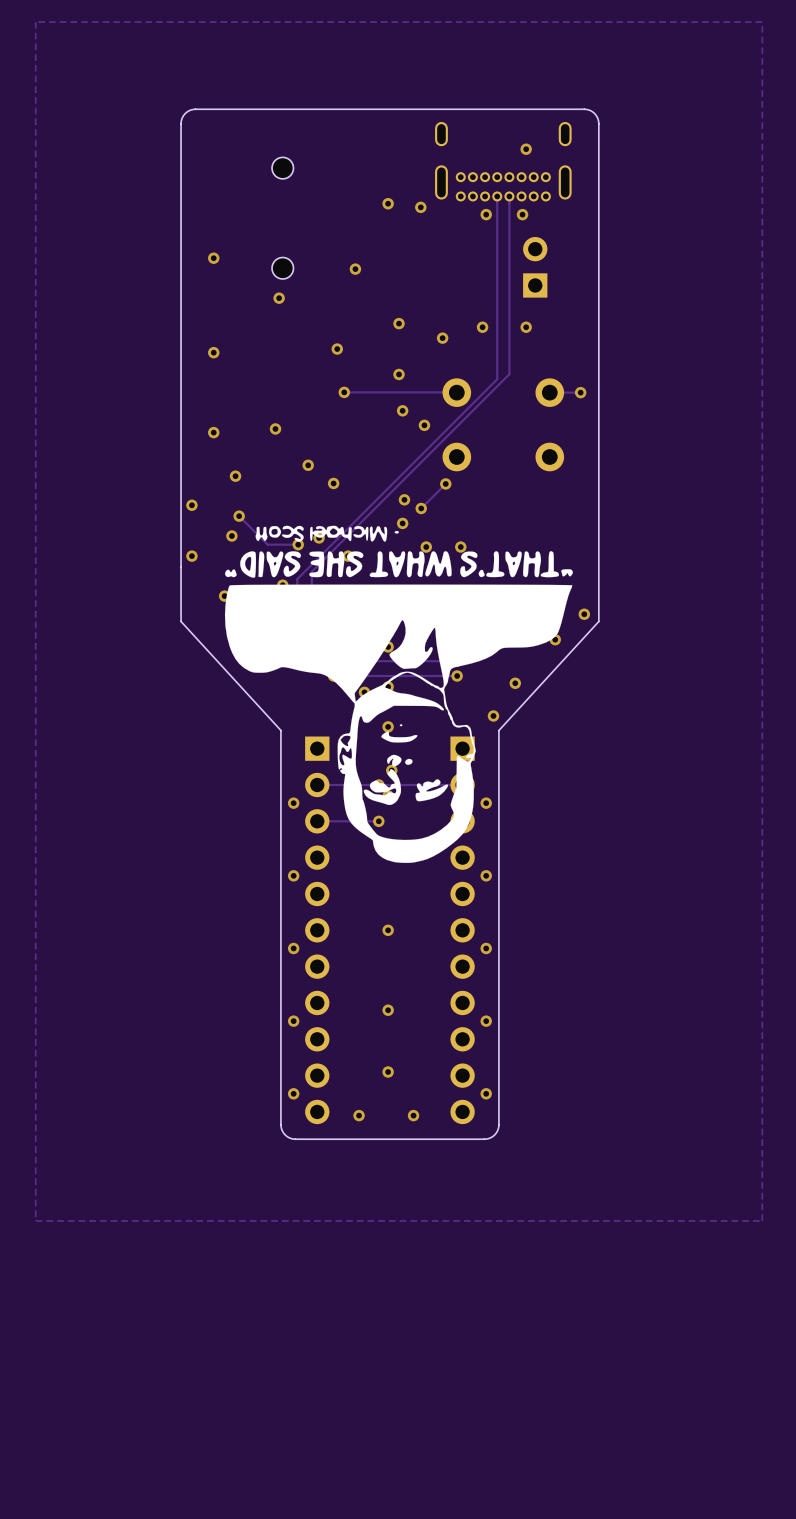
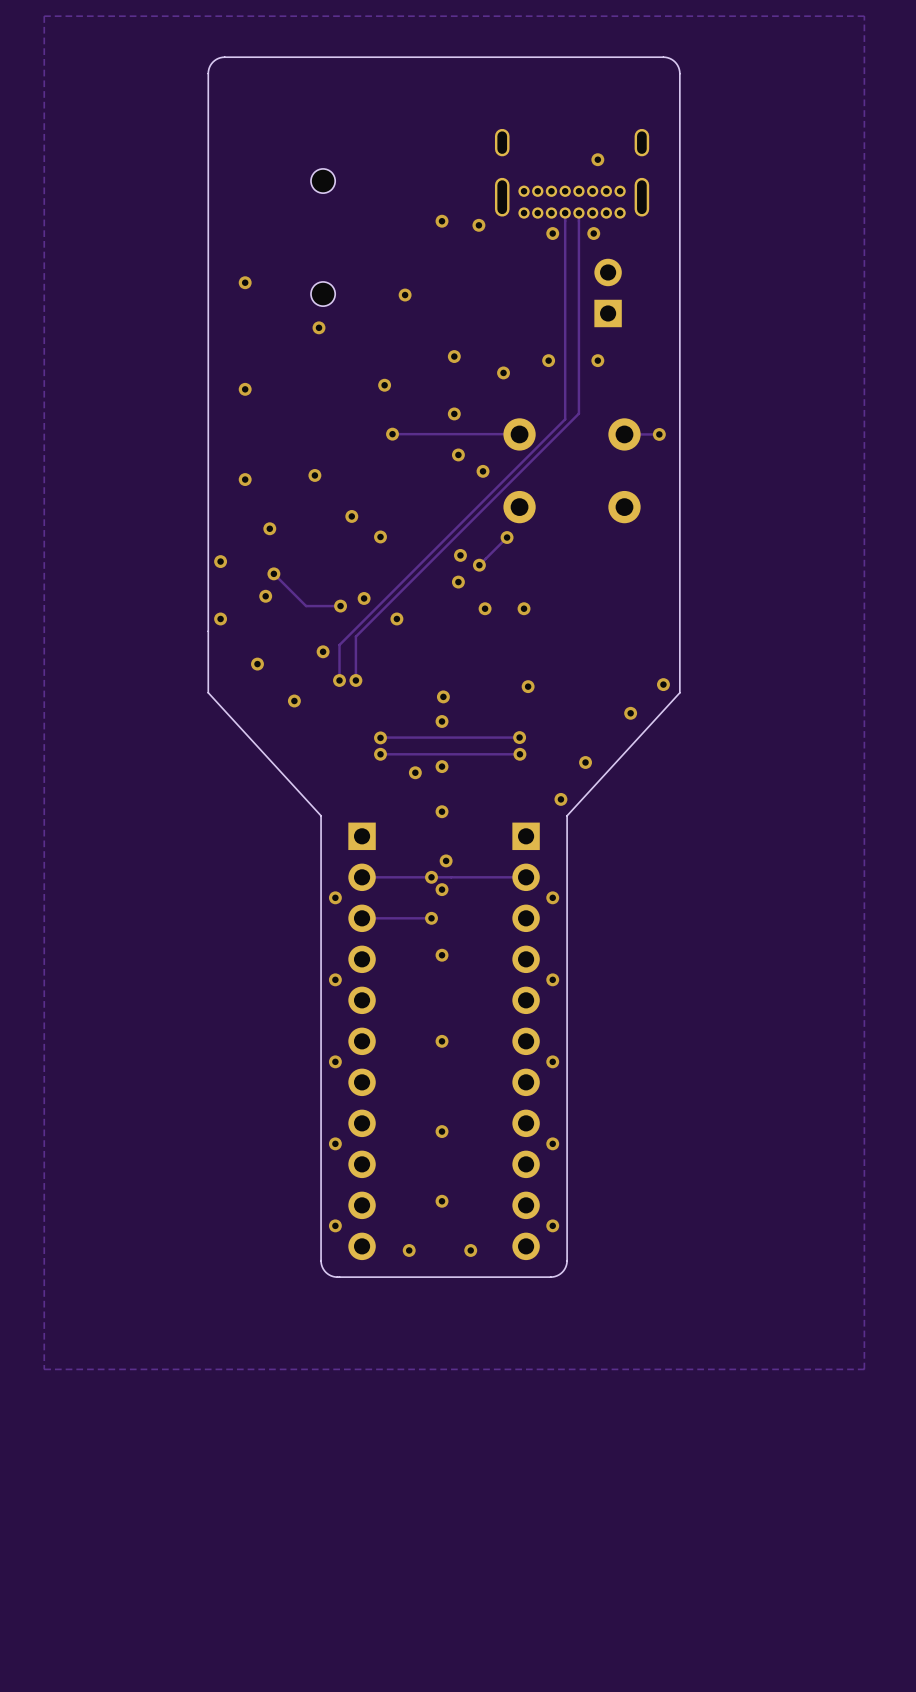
board edge: (598, 123) (594, 113) (584, 109) (195, 109) (185, 113) (181, 123) -> (679, 131) (679, 69) (673, 60) (663, 57) (222, 57) (213, 61) (208, 71) (208, 131)
drawing: [224, 525, 573, 863] -> none

